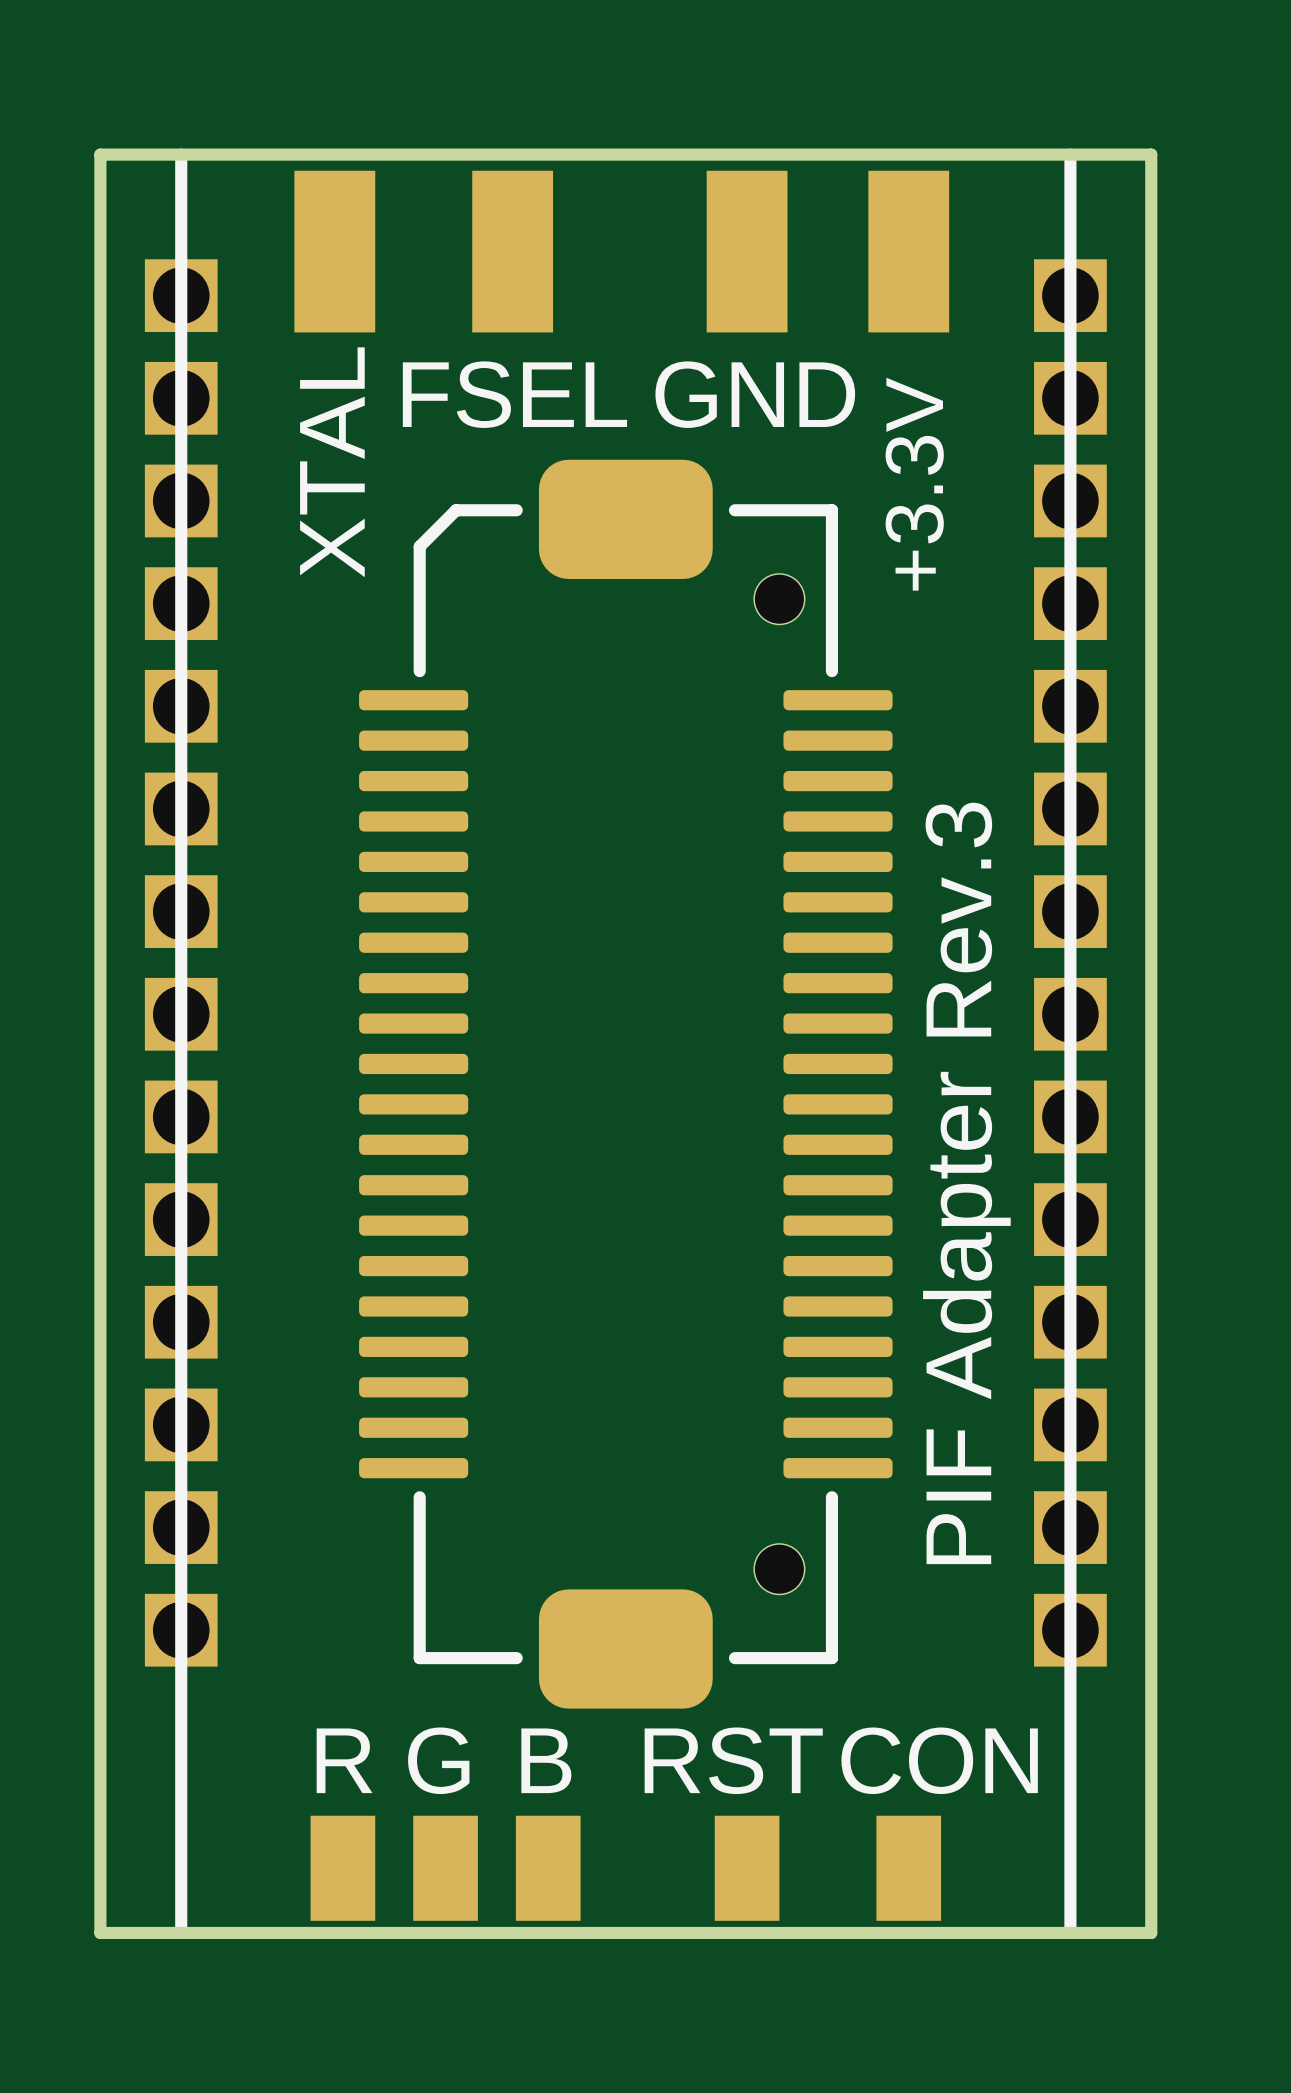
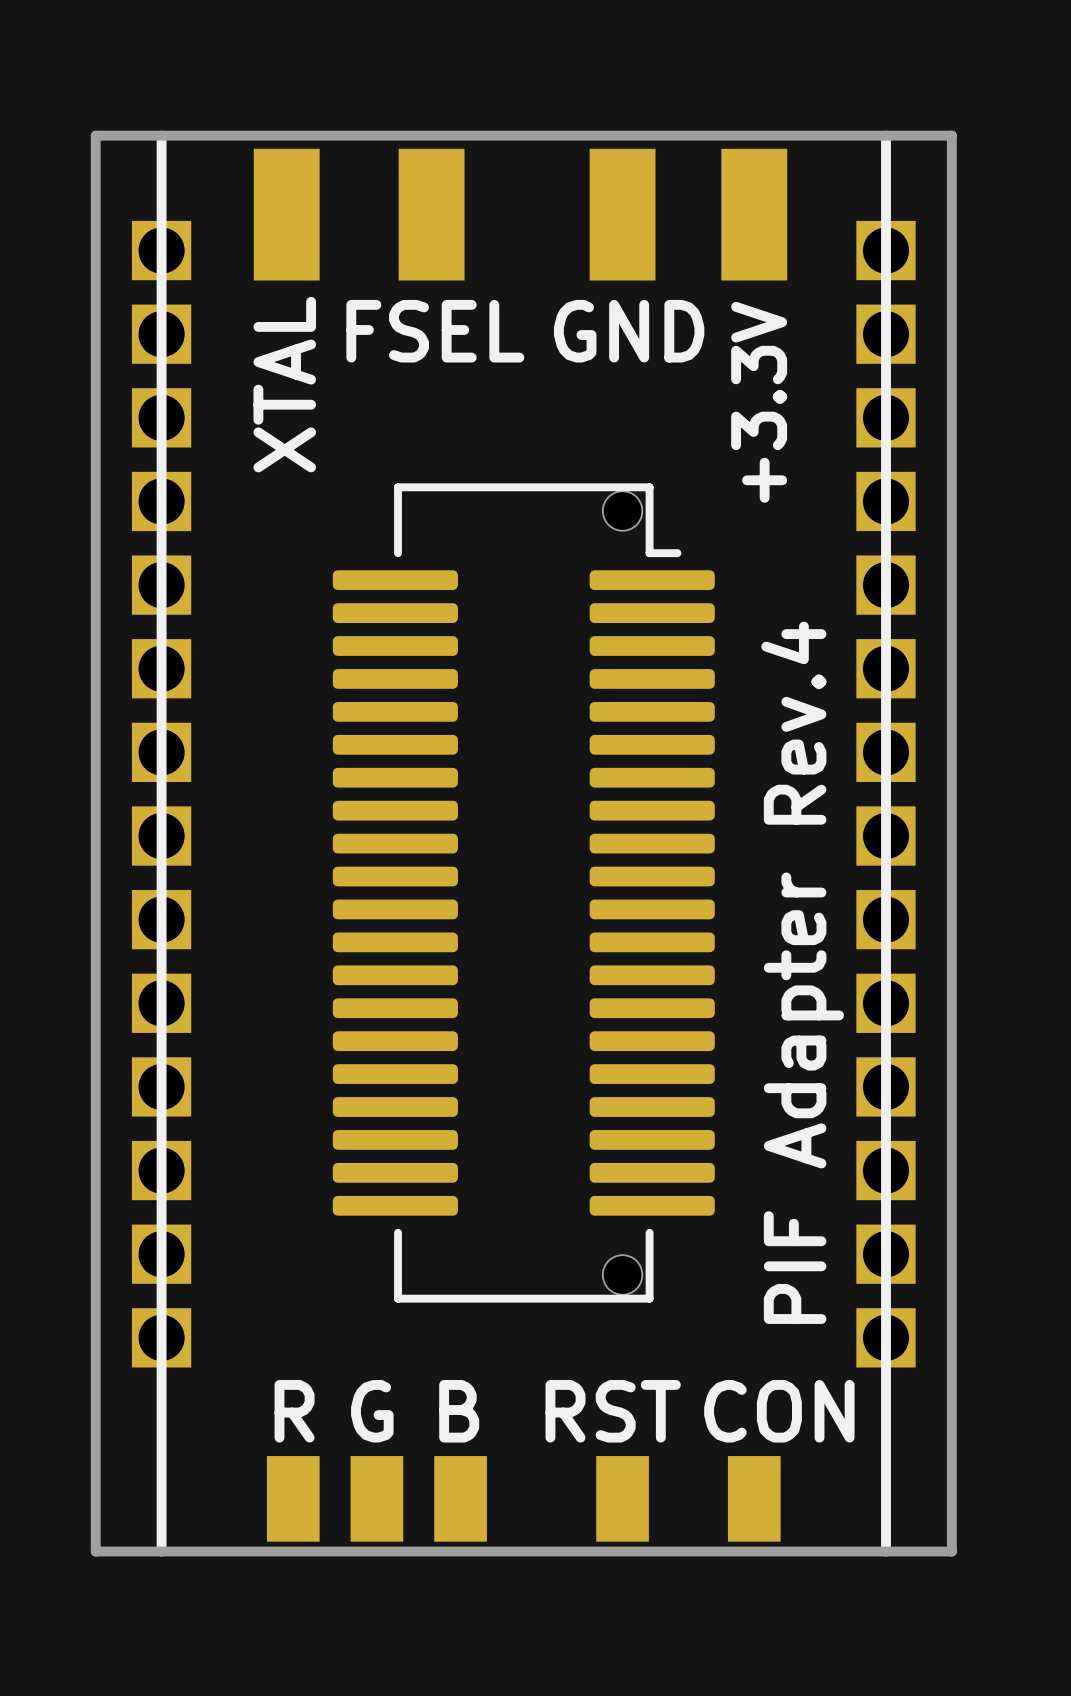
part footprint: [359, 459, 893, 1709] -> [332, 483, 715, 1303]
text: PIF Adapter Rev.3 (966, 1183) -> PIF Adapter Rev.4 (802, 972)
text position: R (344, 1760) -> R (294, 1411)
text position: G (438, 1760) -> G (372, 1411)
text position: B (546, 1760) -> B (459, 1411)
text position: RST (733, 1760) -> RST (613, 1411)
text position: CON (939, 1760) -> CON (779, 1411)
part position: (342, 1868) -> (293, 1498)
part position: (445, 1868) -> (376, 1498)
part position: (548, 1868) -> (460, 1498)
part position: (747, 1868) -> (622, 1498)
part position: (908, 1868) -> (754, 1498)
board edge: (100, 1892) (100, 1932) (1151, 1932) (1151, 1892) -> (95, 1551) (951, 1551)
line: (181, 1892) (181, 1932) -> none
line: (1070, 1892) (1070, 1932) -> none

